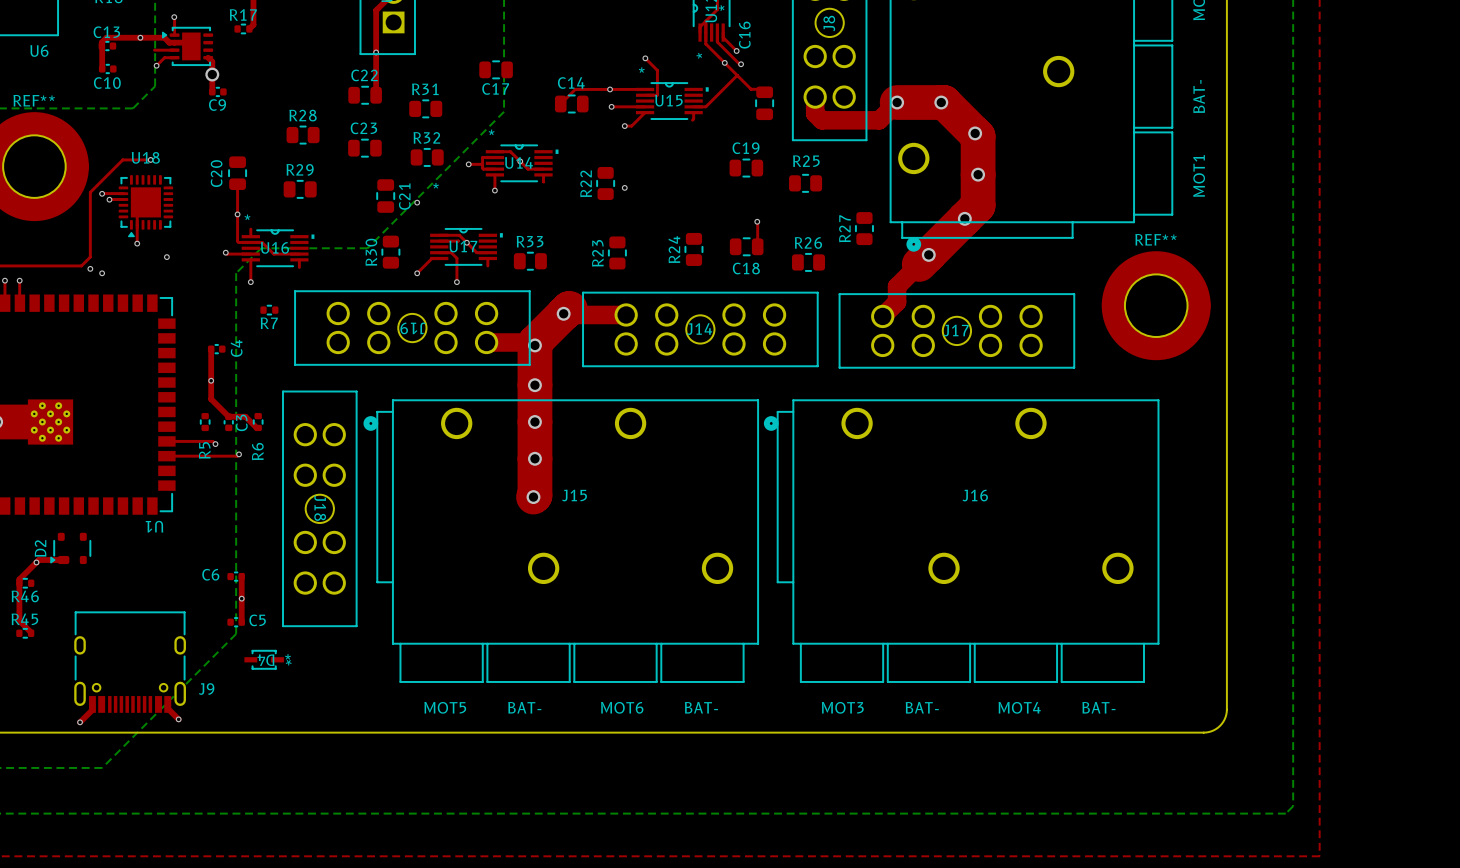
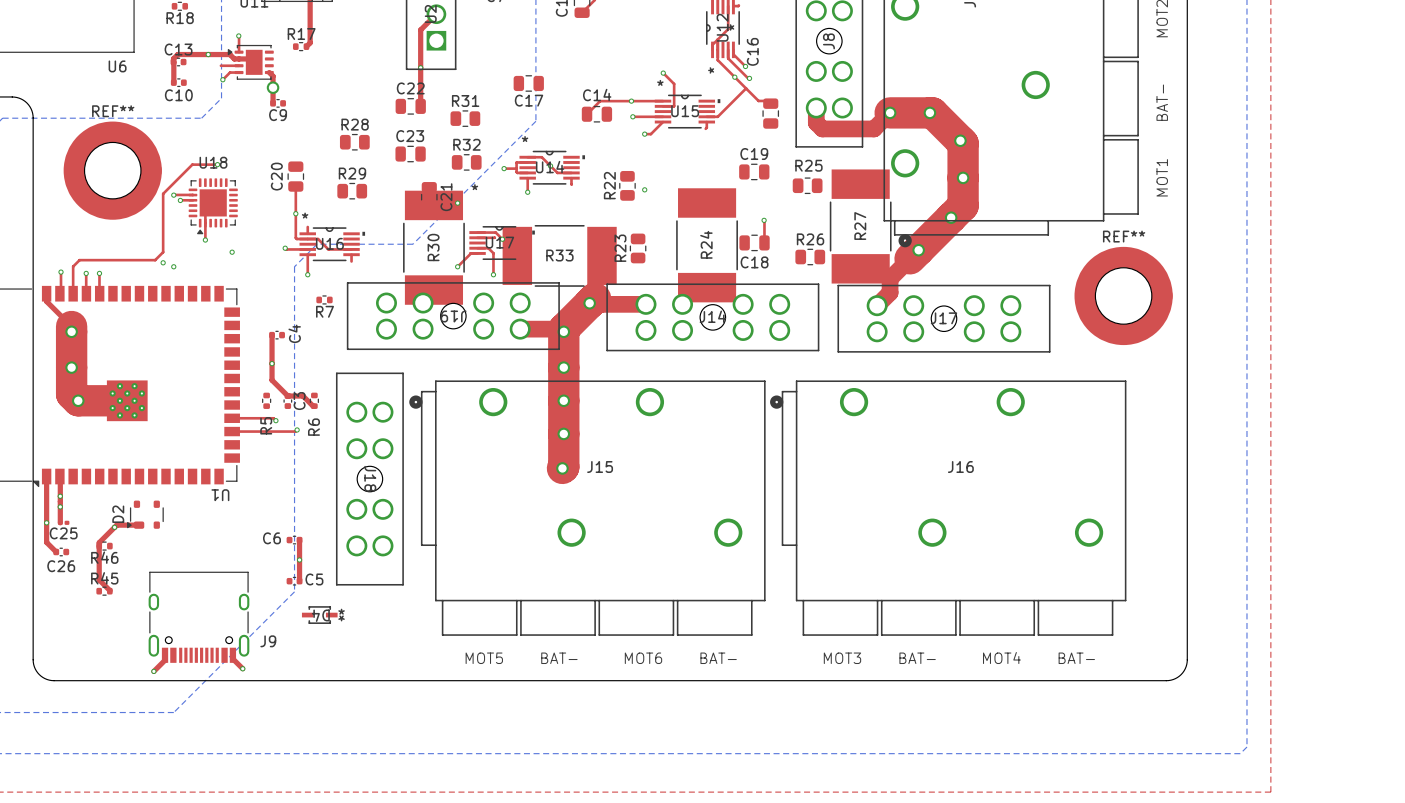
R27 footprint: [855, 212, 874, 246] -> [829, 169, 892, 284]
R24 footprint: [684, 232, 704, 266] -> [676, 188, 738, 303]
R30 footprint: [381, 235, 401, 269] -> [403, 190, 465, 305]
R33 footprint: [513, 252, 547, 271] -> [502, 225, 617, 287]

